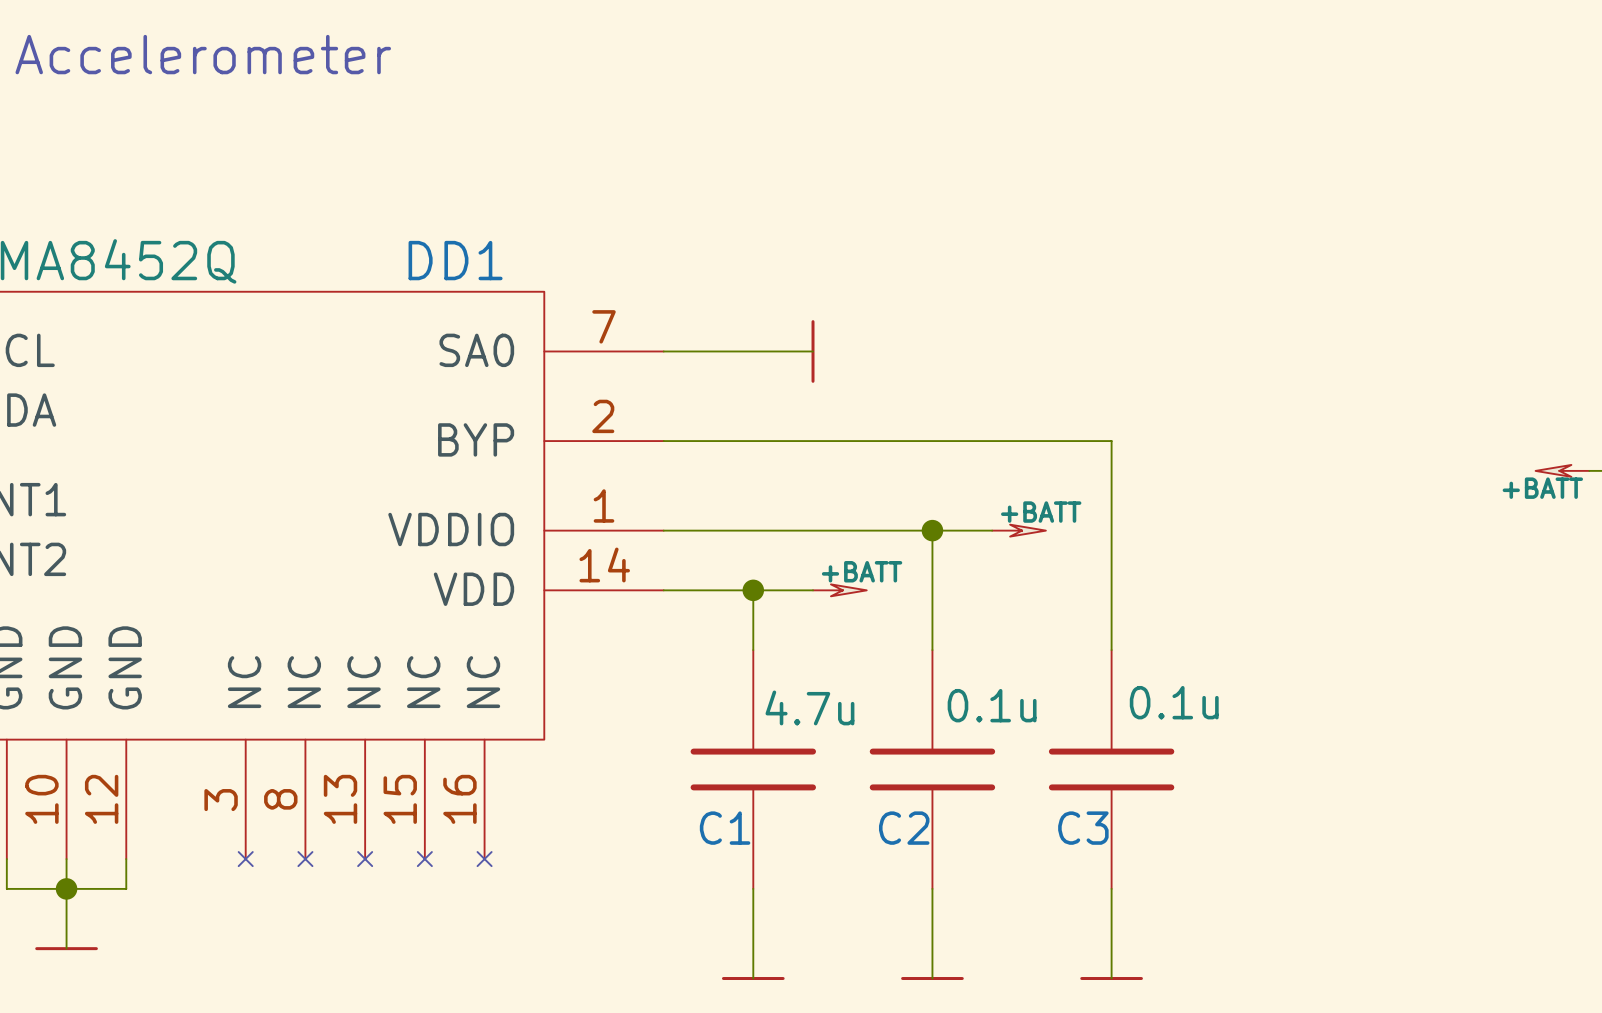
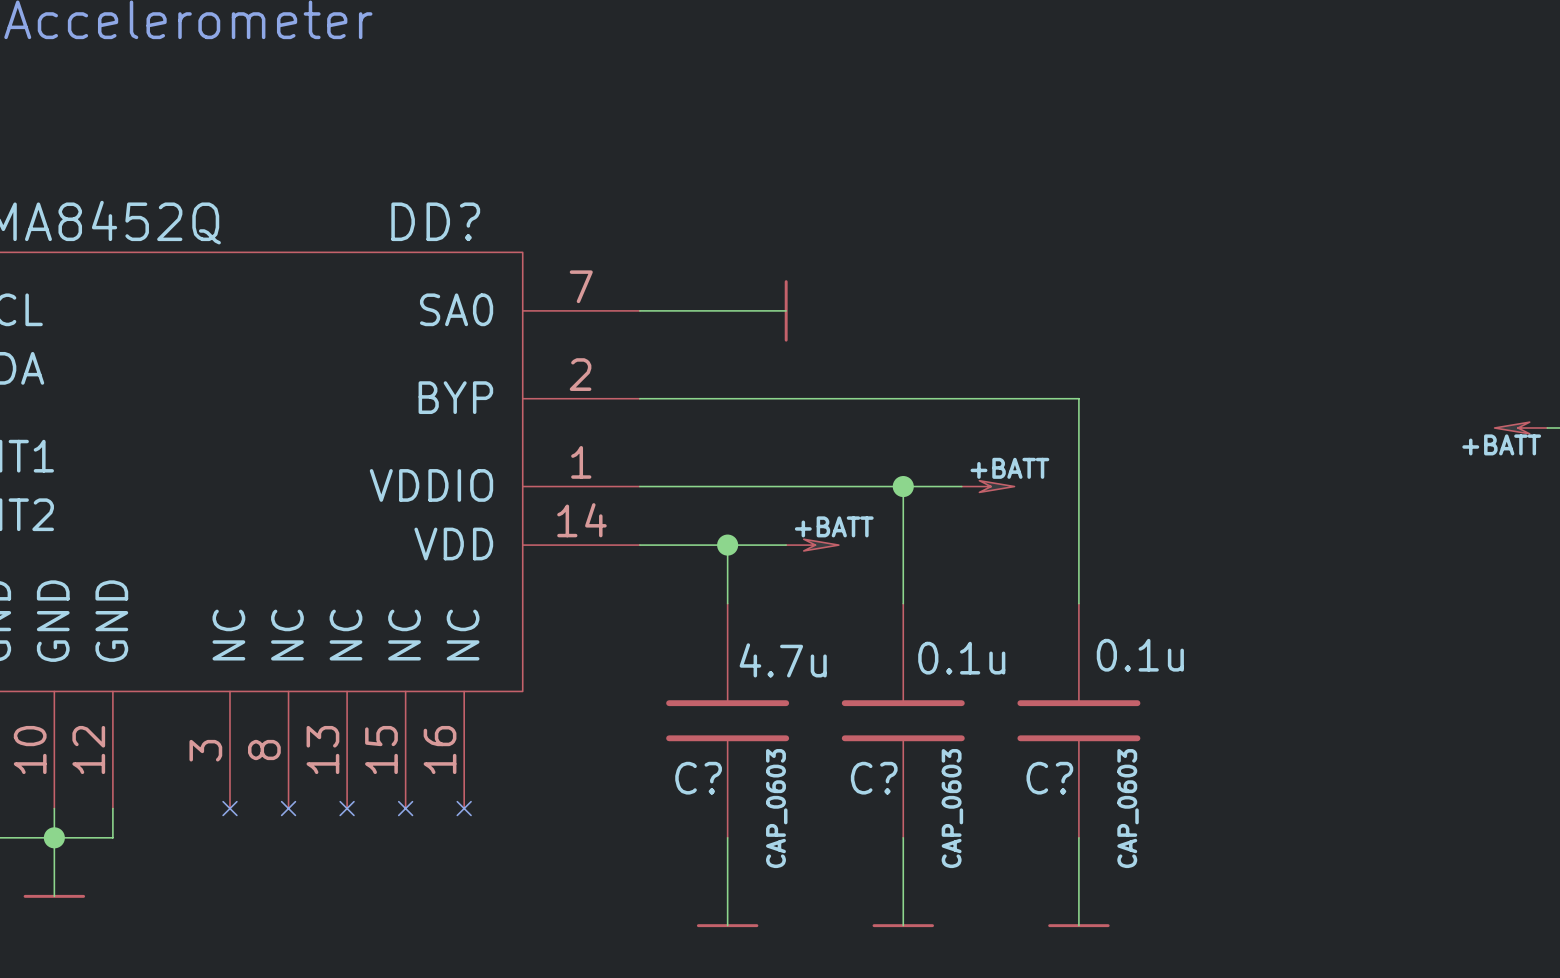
DD1 name: DD1 (455, 260) -> DD? (435, 221)
C1 name: C1 (725, 828) -> C? (698, 778)
C2 name: C2 (904, 828) -> C? (874, 778)
C3 name: C3 (1083, 828) -> C? (1049, 778)
C1 text: none -> CAP_0603 (776, 808)
C2 text: none -> CAP_0603 (952, 808)
C3 text: none -> CAP_0603 (1128, 808)

